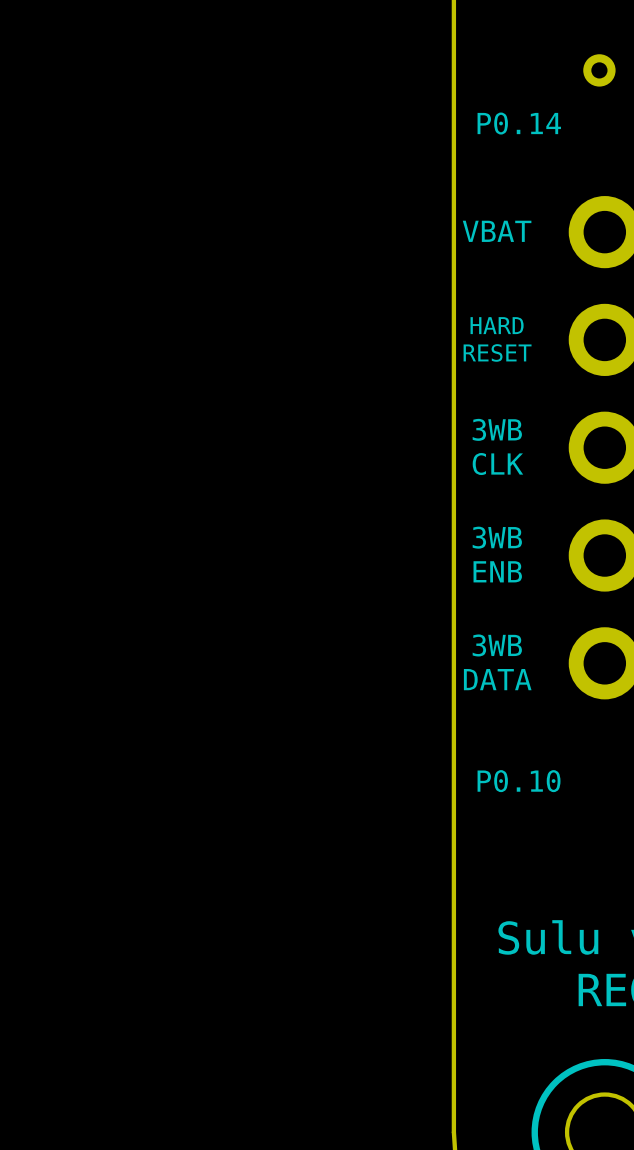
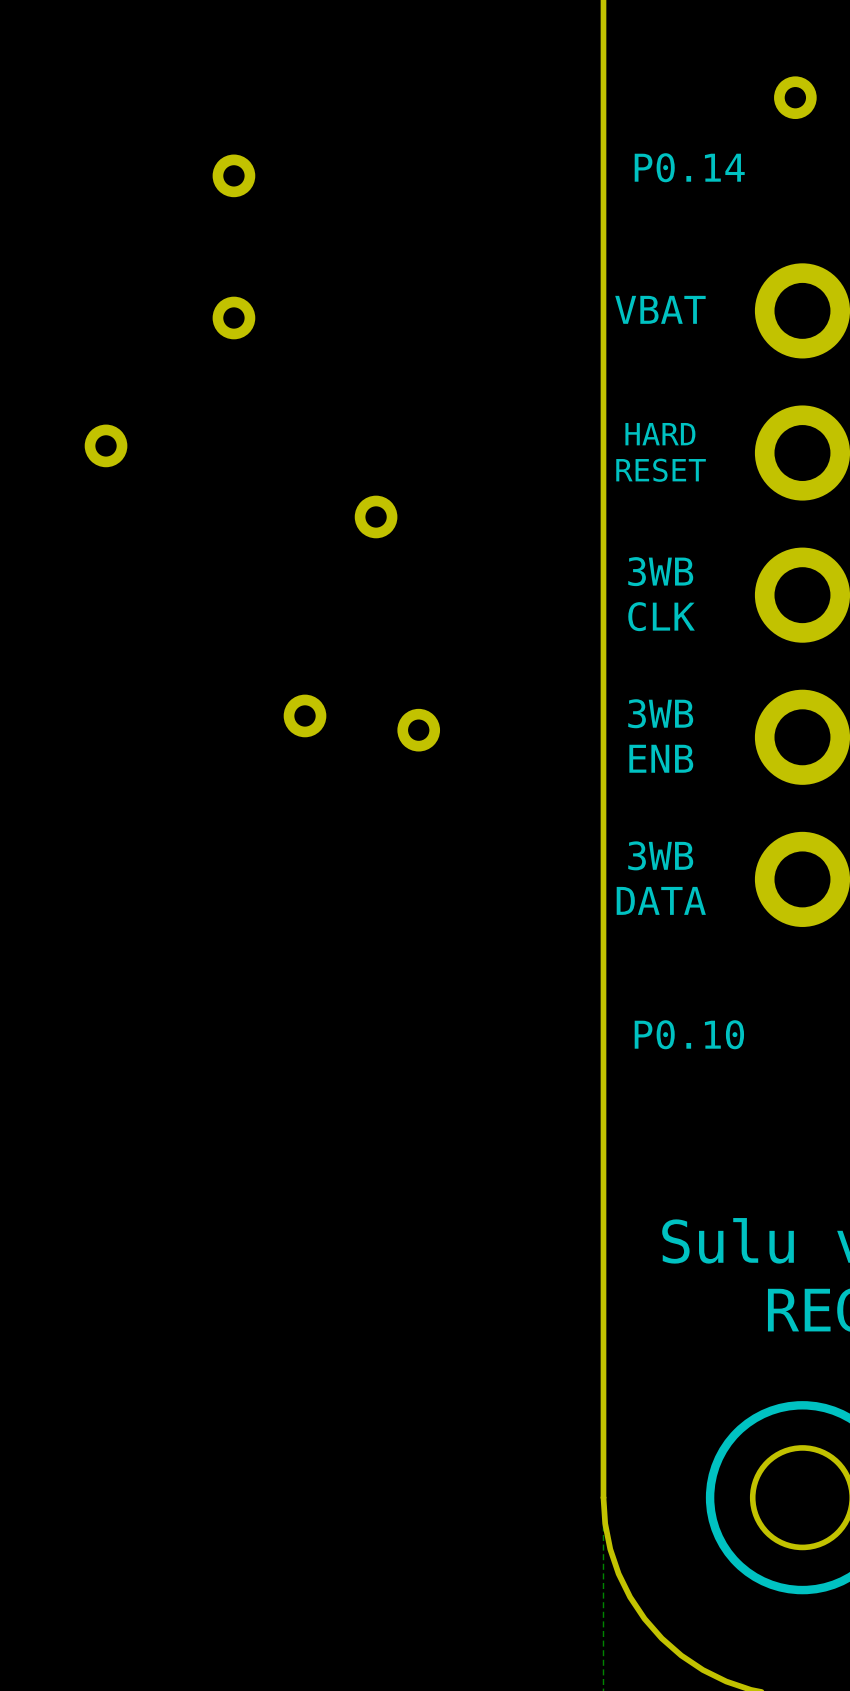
part: none -> (233, 175)
part: none -> (233, 317)
part: none -> (106, 445)
part: none -> (376, 516)
part: none -> (305, 715)
part: none -> (418, 730)

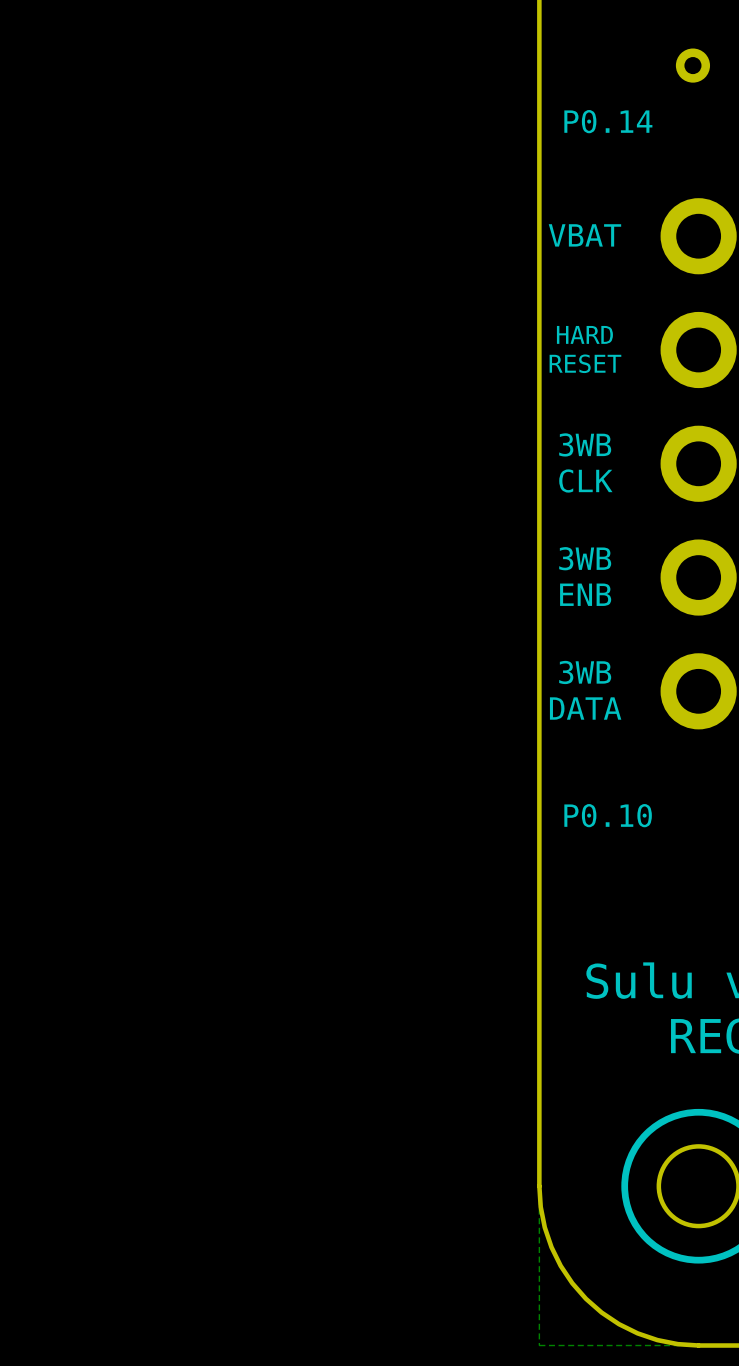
part: (233, 175) -> none
part: (233, 317) -> none
part: (106, 445) -> none
part: (376, 516) -> none
part: (305, 715) -> none
part: (418, 730) -> none

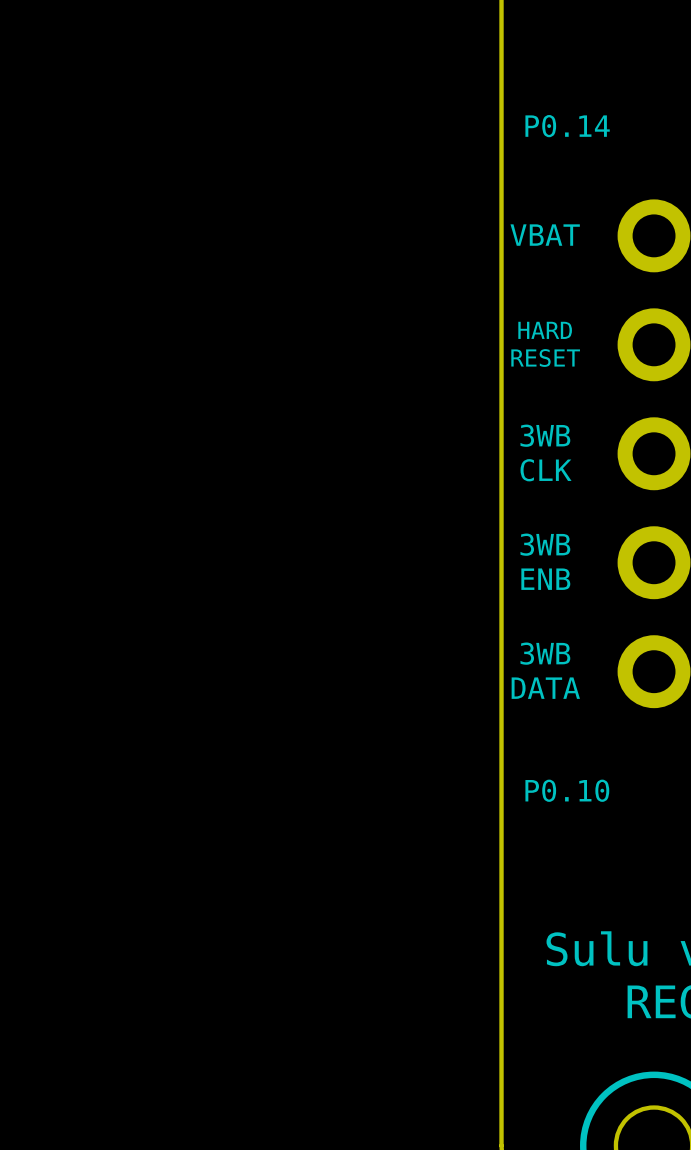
part: (692, 65) -> none

